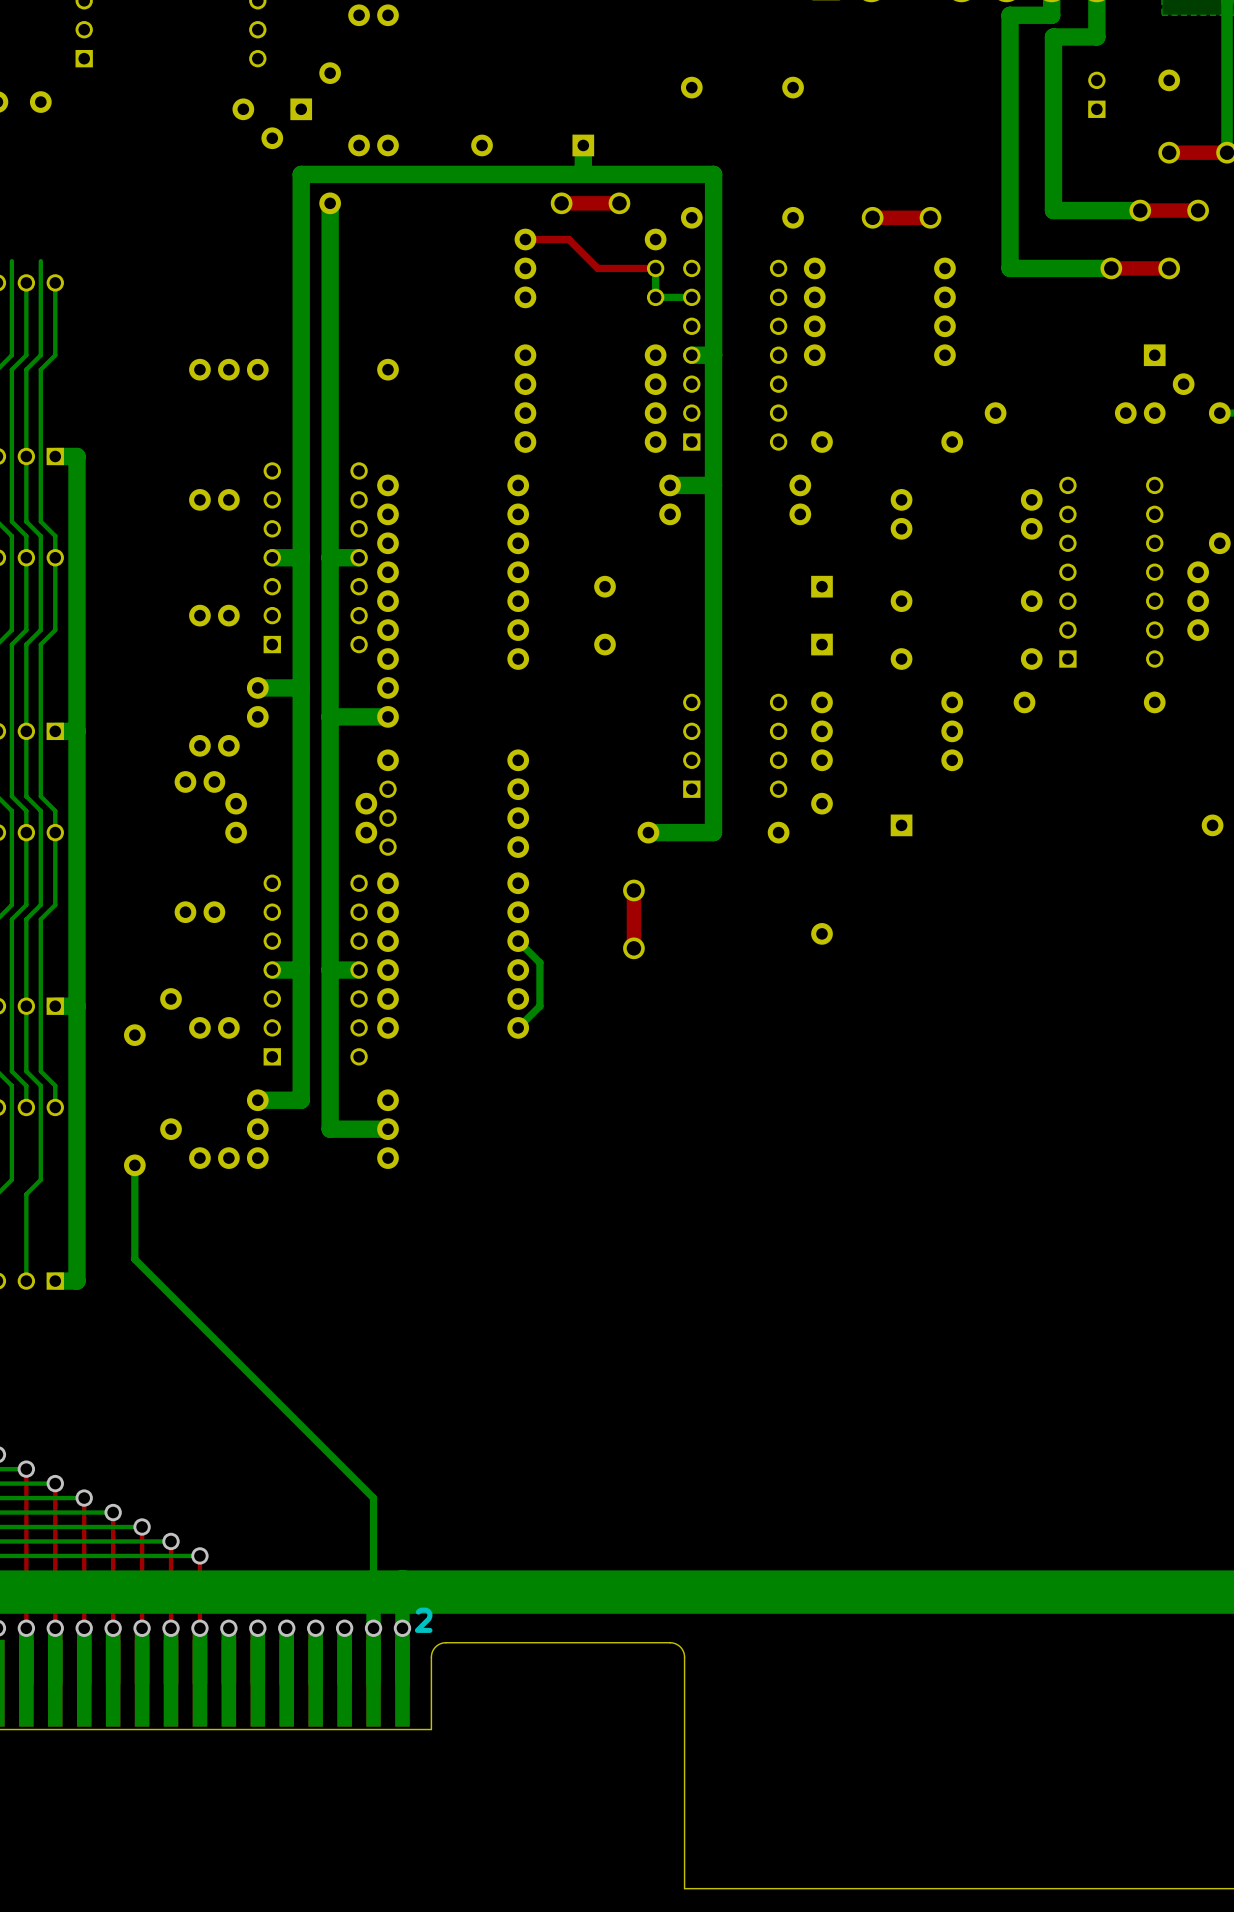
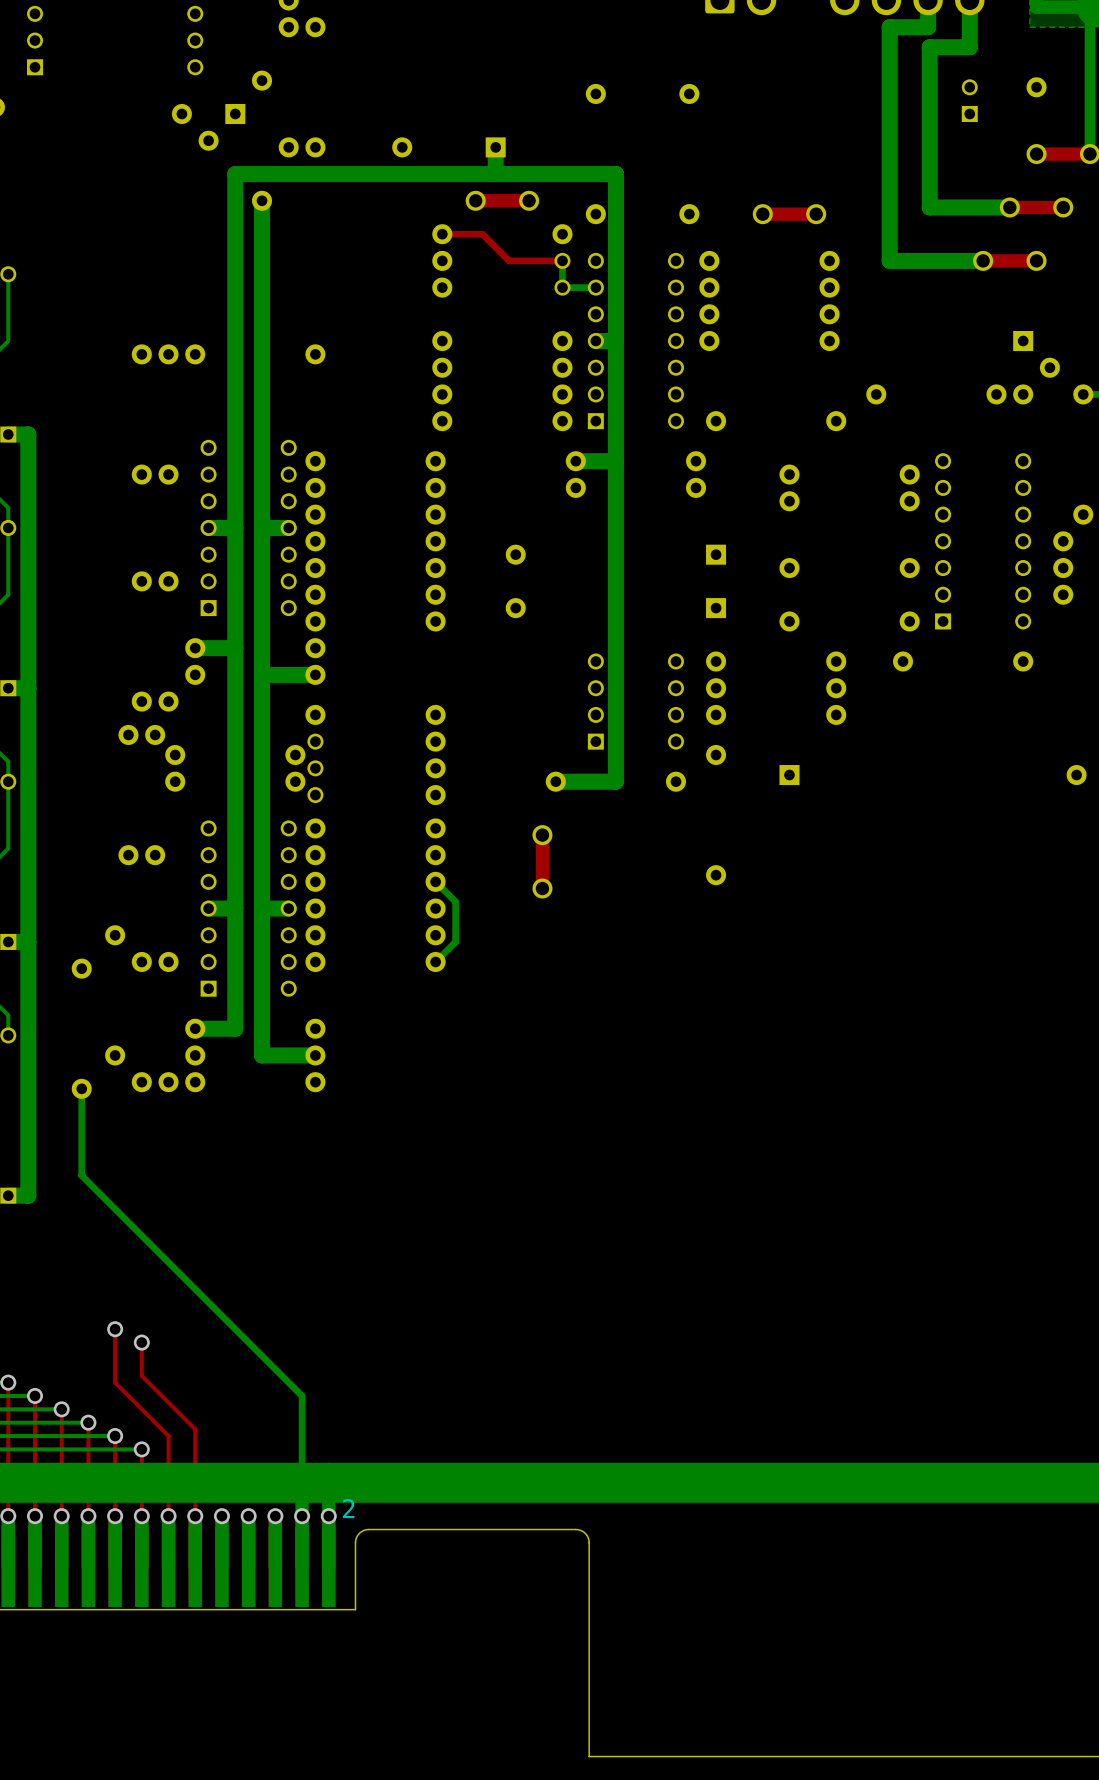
top track: none -> (115, 1329) (115, 1382) (168, 1436) (168, 1516)
via: none -> (115, 1329)
top track: none -> (141, 1342) (141, 1375) (195, 1429) (195, 1516)
via: none -> (141, 1342)

